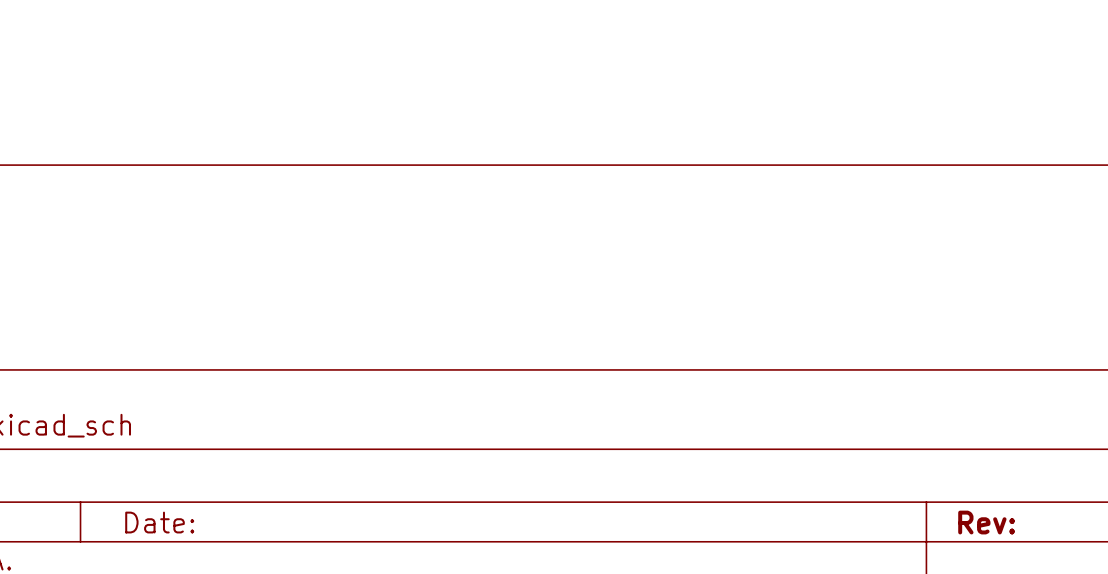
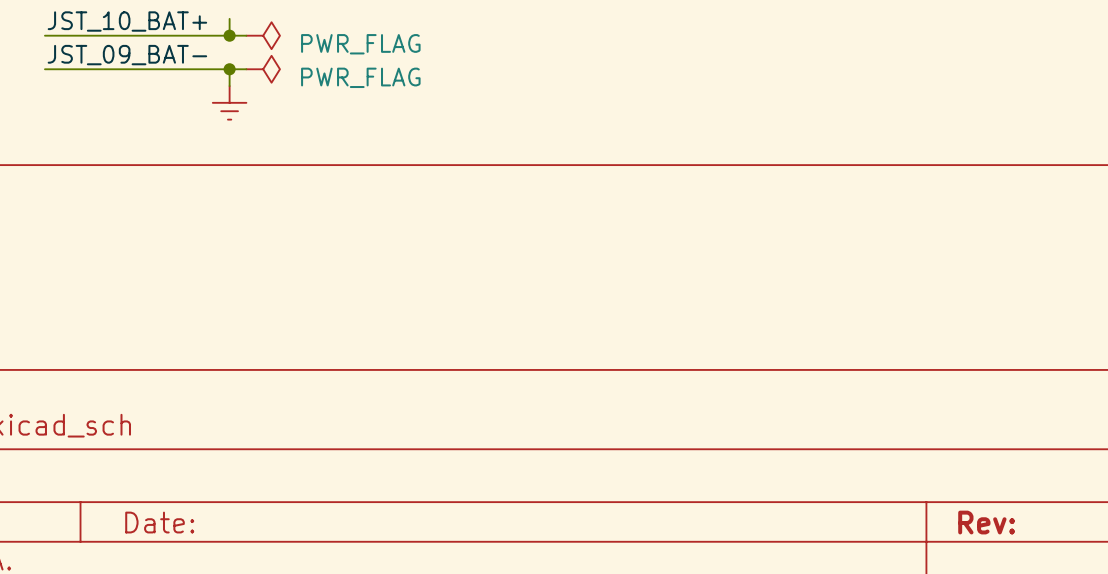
wire: none -> (229, 18) (229, 35)
label: none -> JST_10_BAT+ (127, 21)
wire: none -> (44, 35) (246, 35)
junction: none -> (229, 35)
power symbol: none -> PWR_FLAG (263, 35)
label: none -> JST_09_BAT- (127, 55)
wire: none -> (44, 69) (246, 69)
wire: none -> (229, 69) (229, 86)
junction: none -> (229, 69)
power symbol: none -> PWR_FLAG (263, 69)
power symbol: none -> (229, 102)

